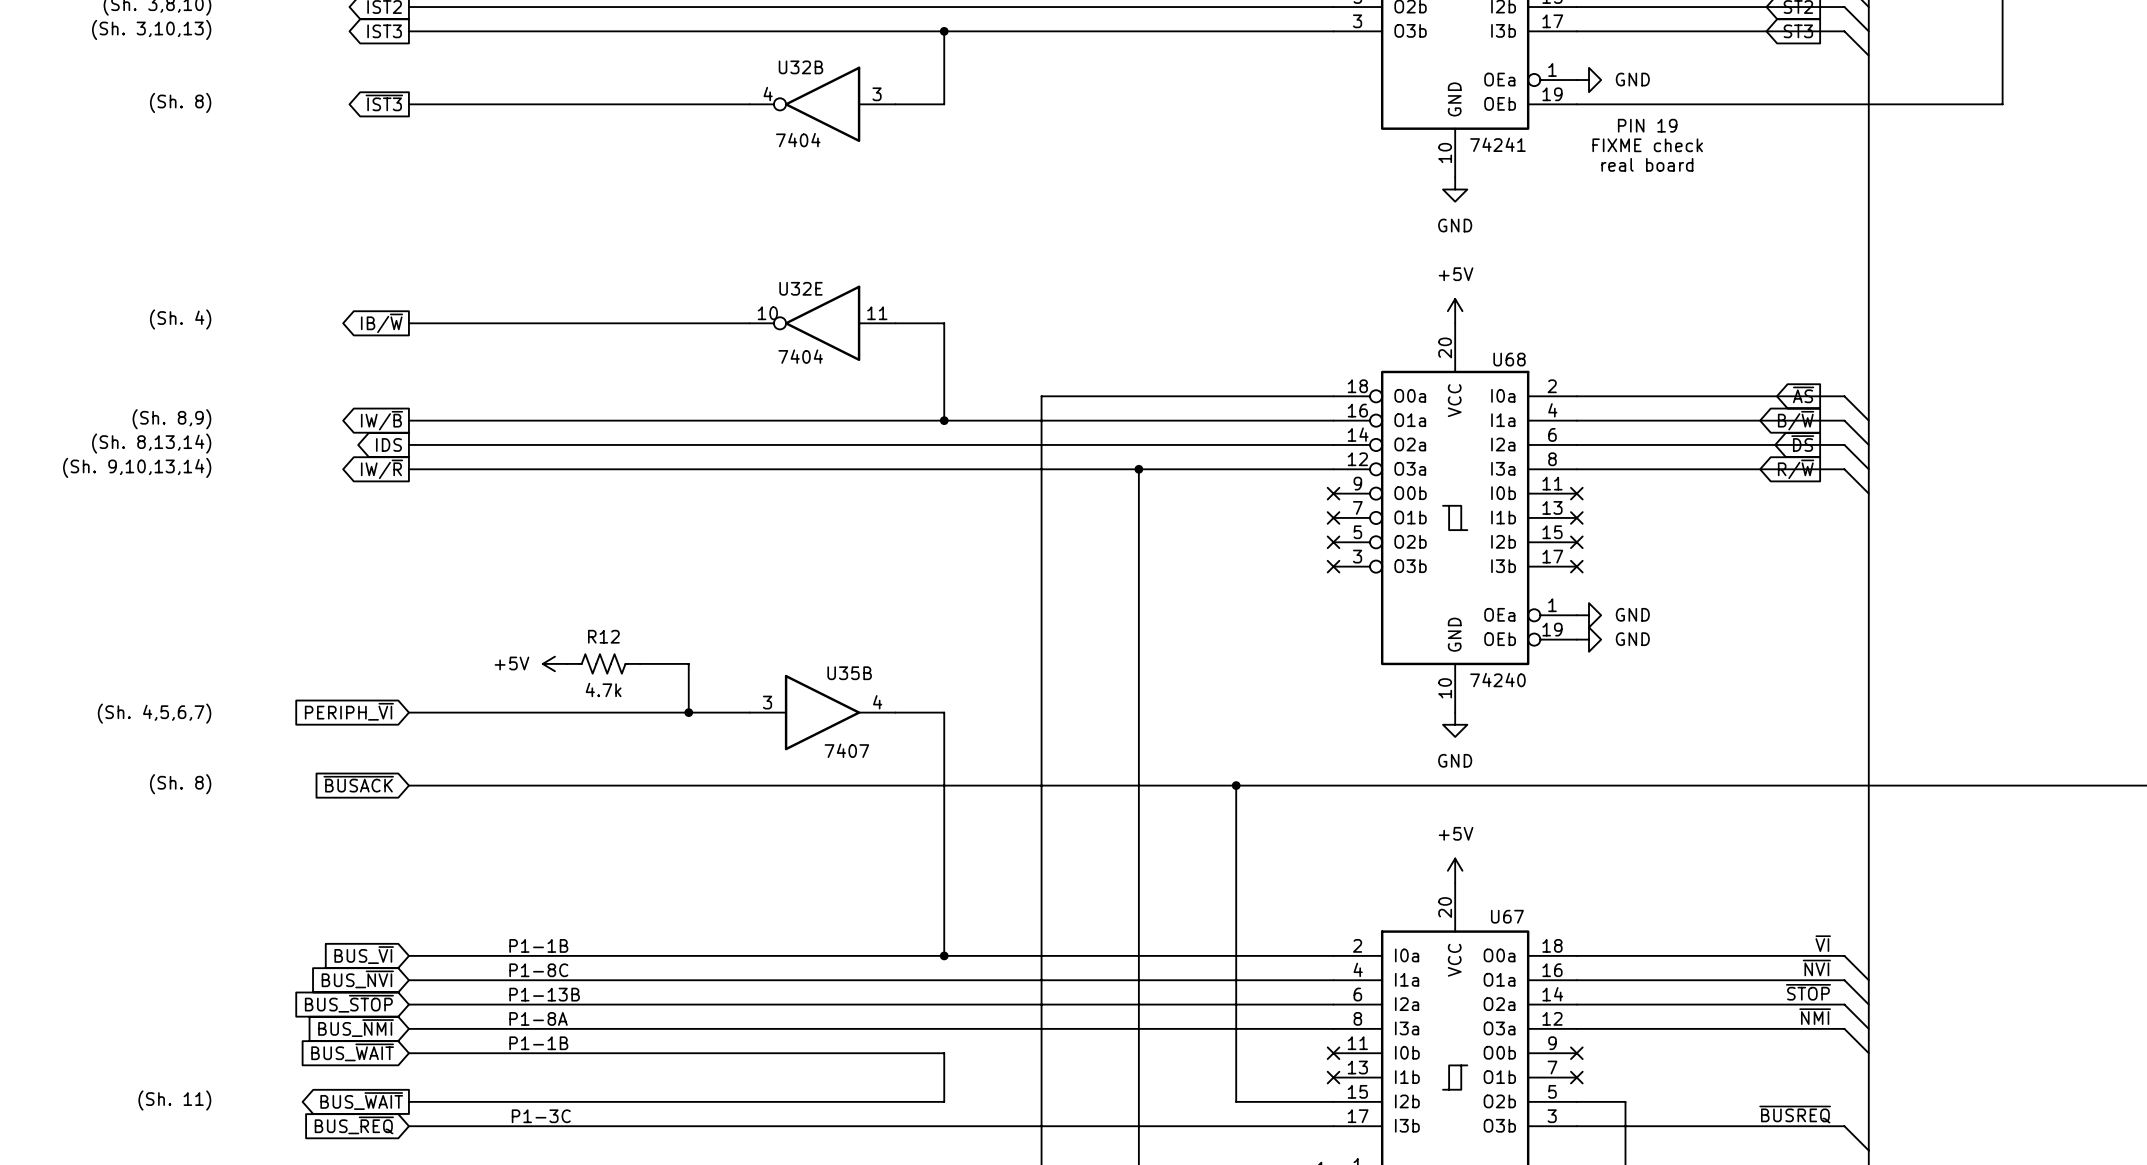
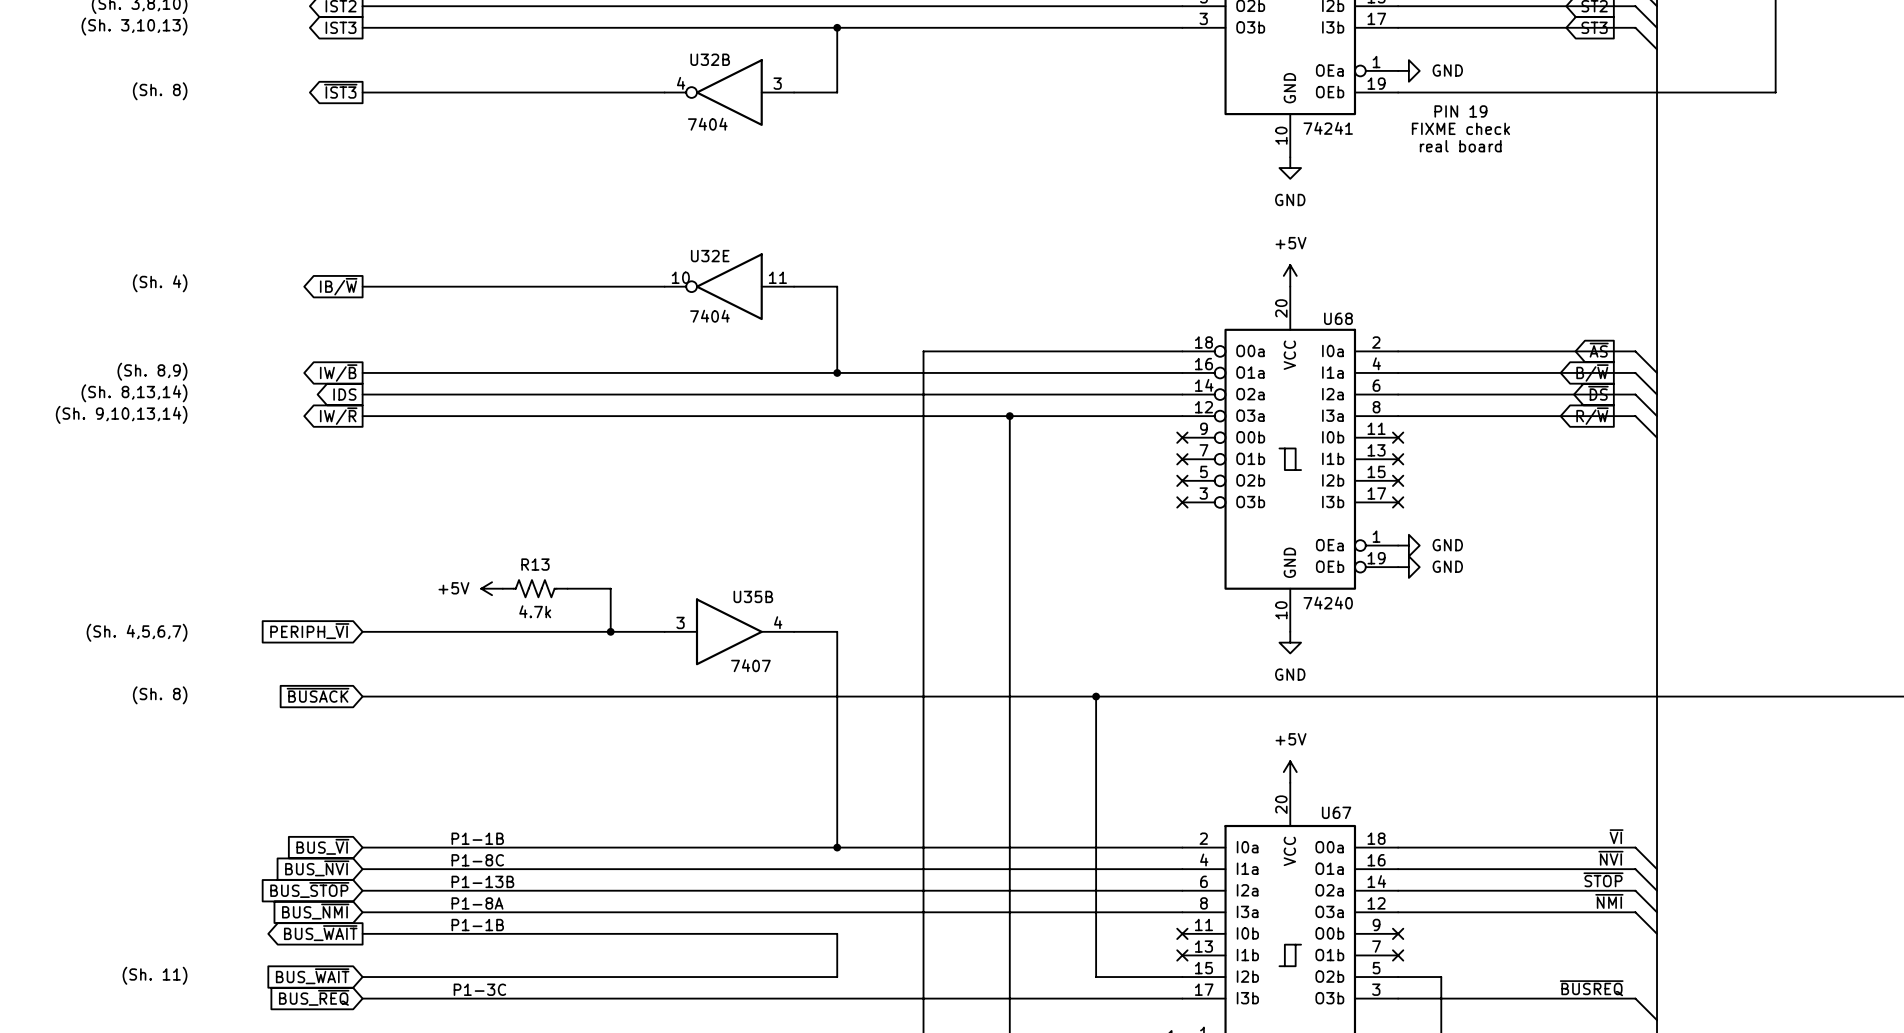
R12 name: R12 (603, 636) -> R13 (535, 564)
global label shape: input (352, 1052) -> output (320, 933)
global label shape: output (361, 1101) -> input (312, 976)

